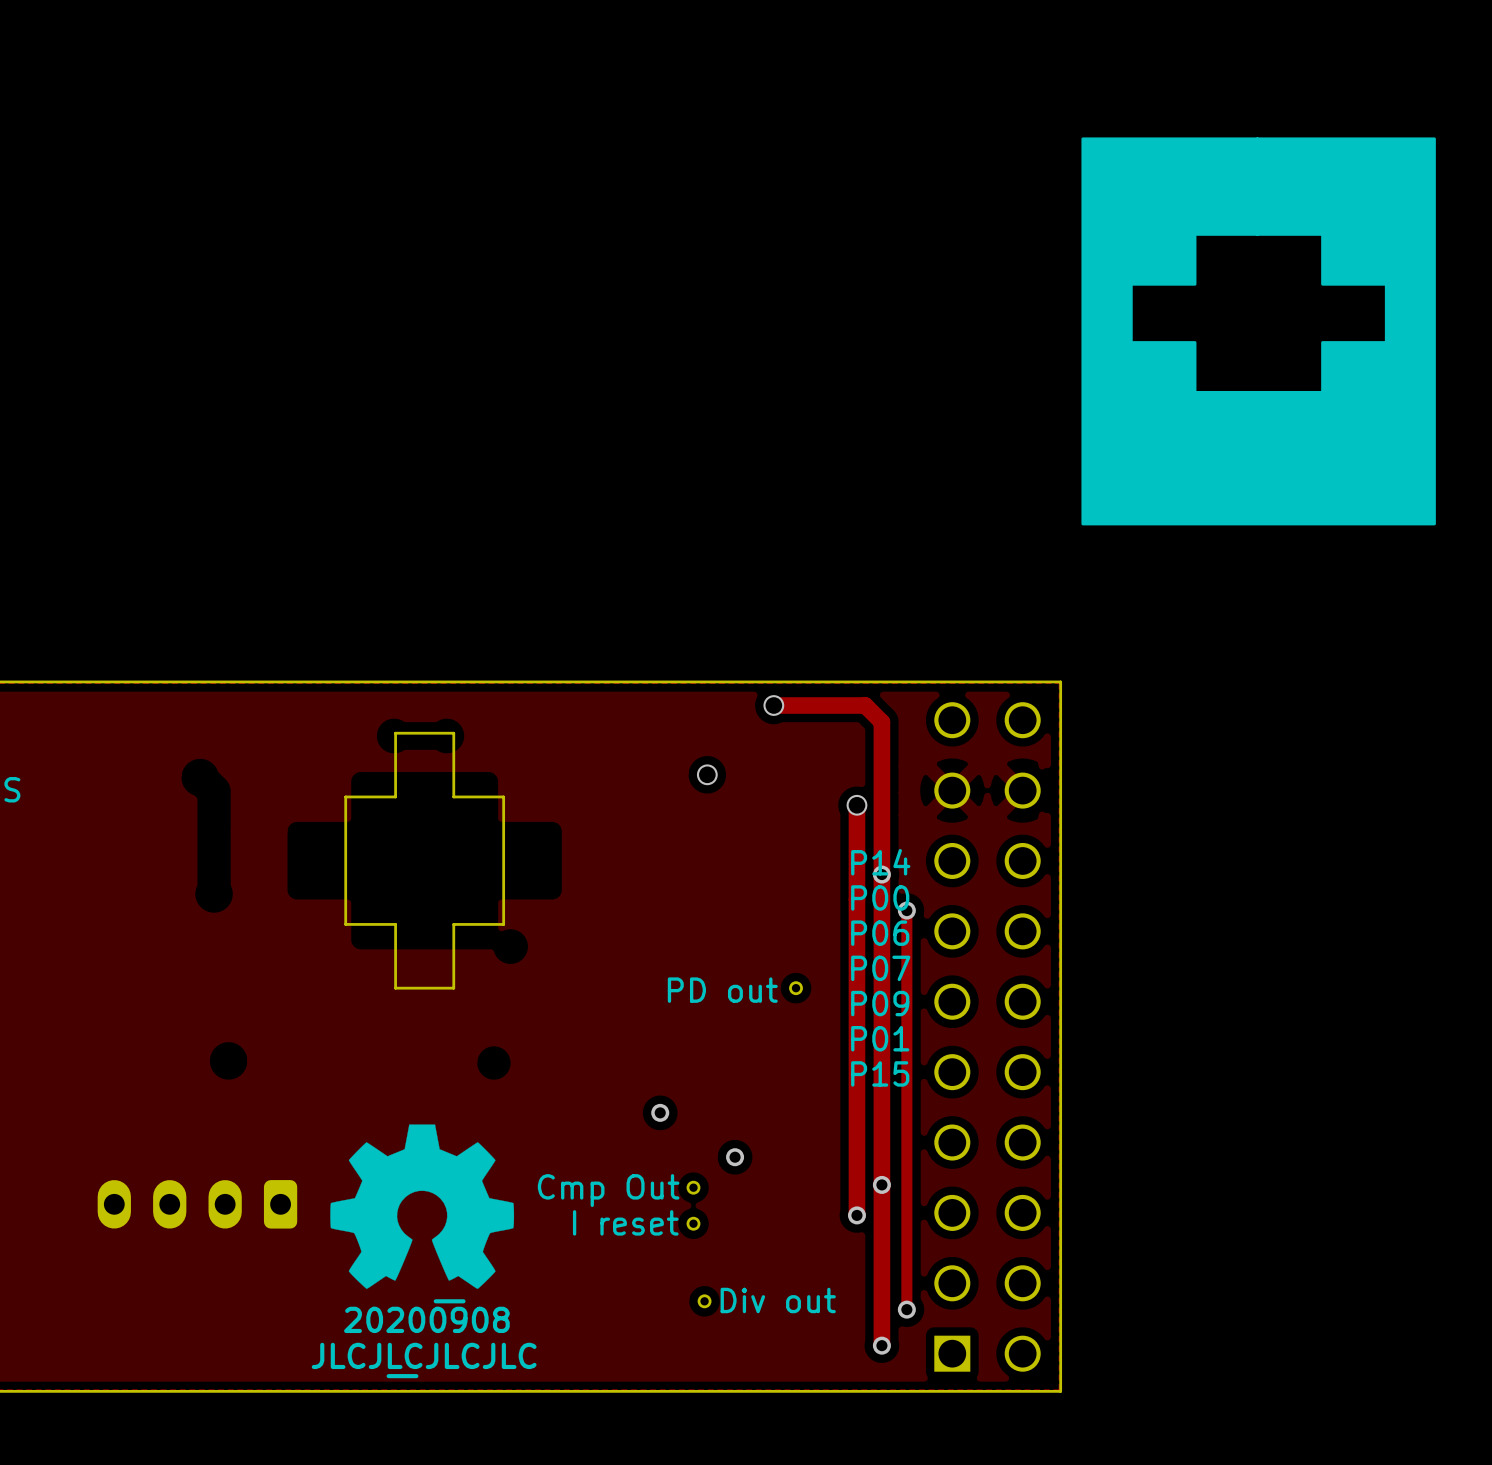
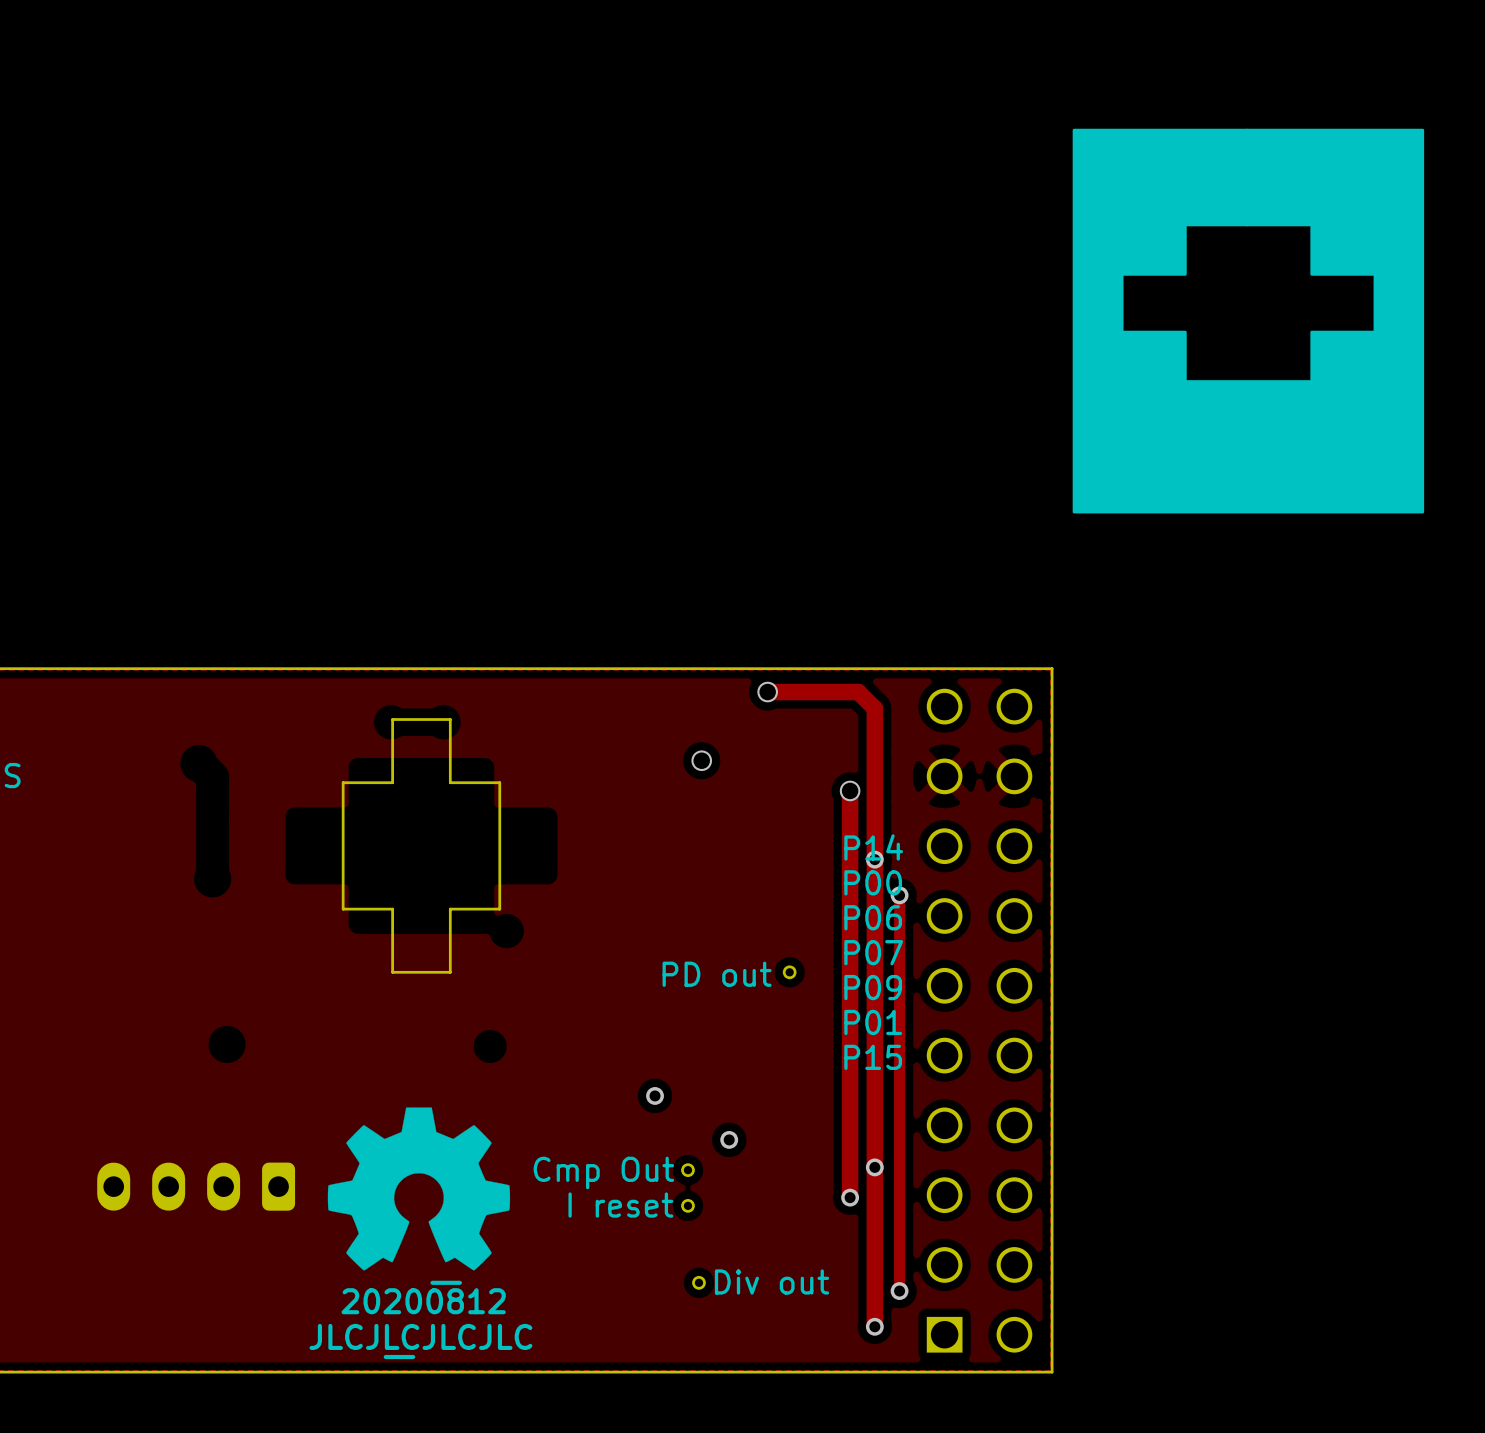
drawing shape: [344, 1299, 510, 1334] -> [341, 1280, 506, 1315]

